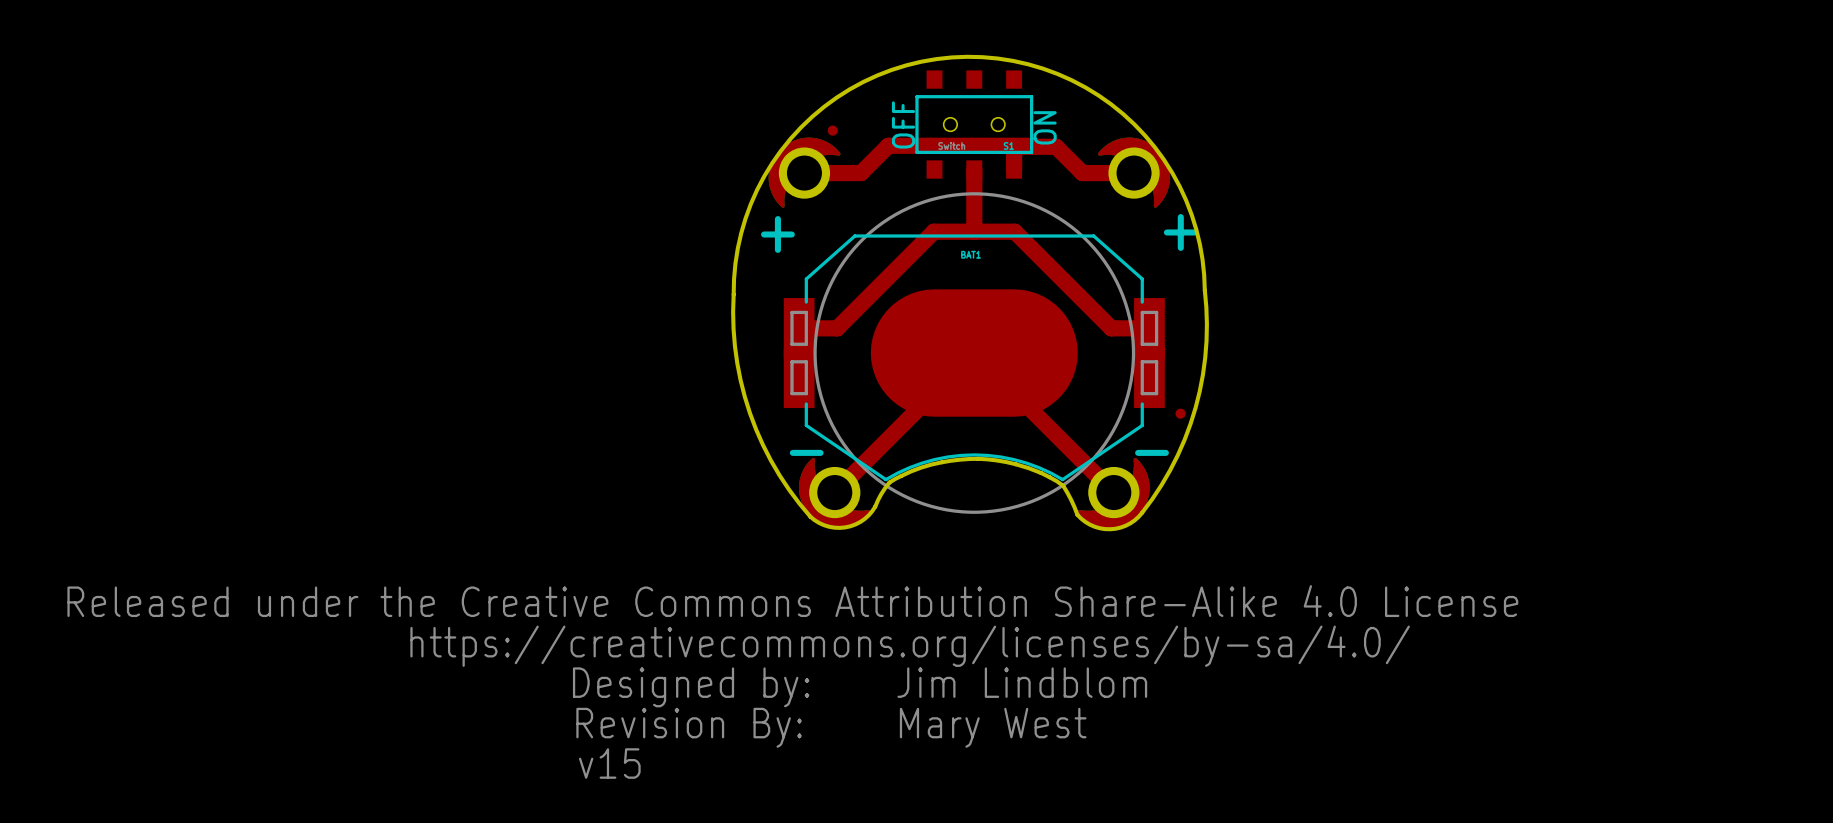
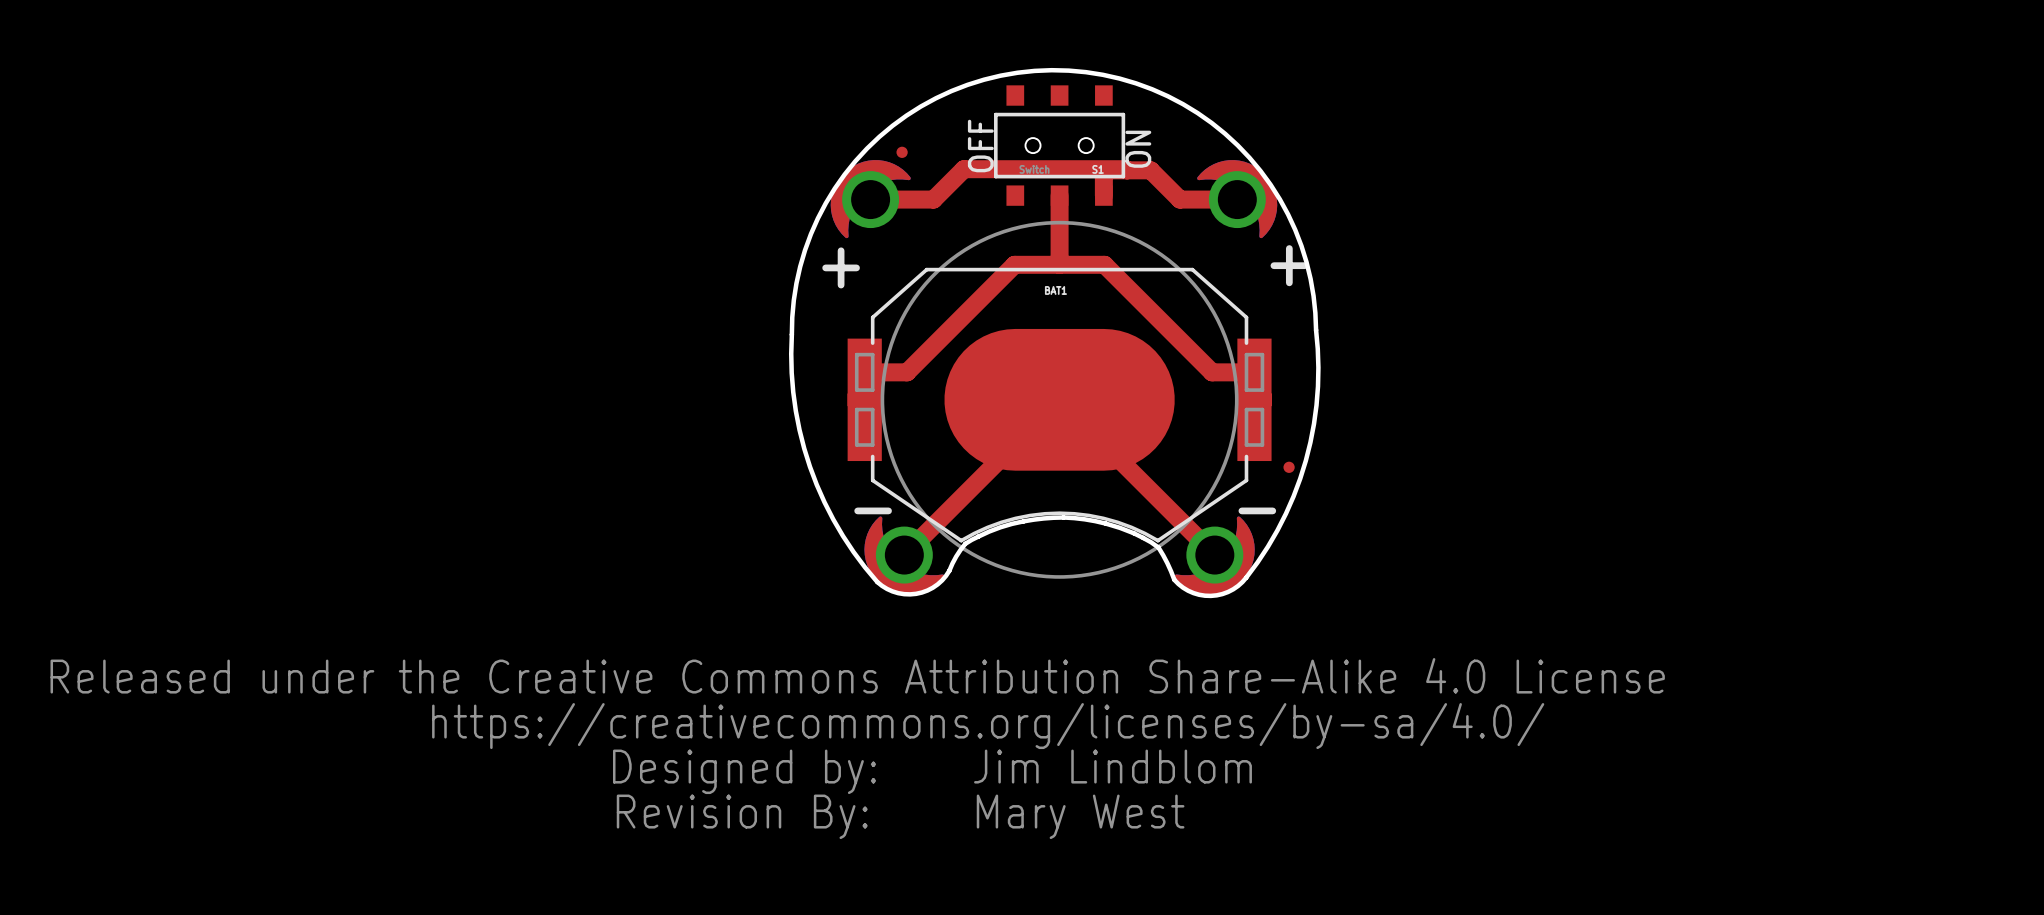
text: v15 (609, 763) -> none

